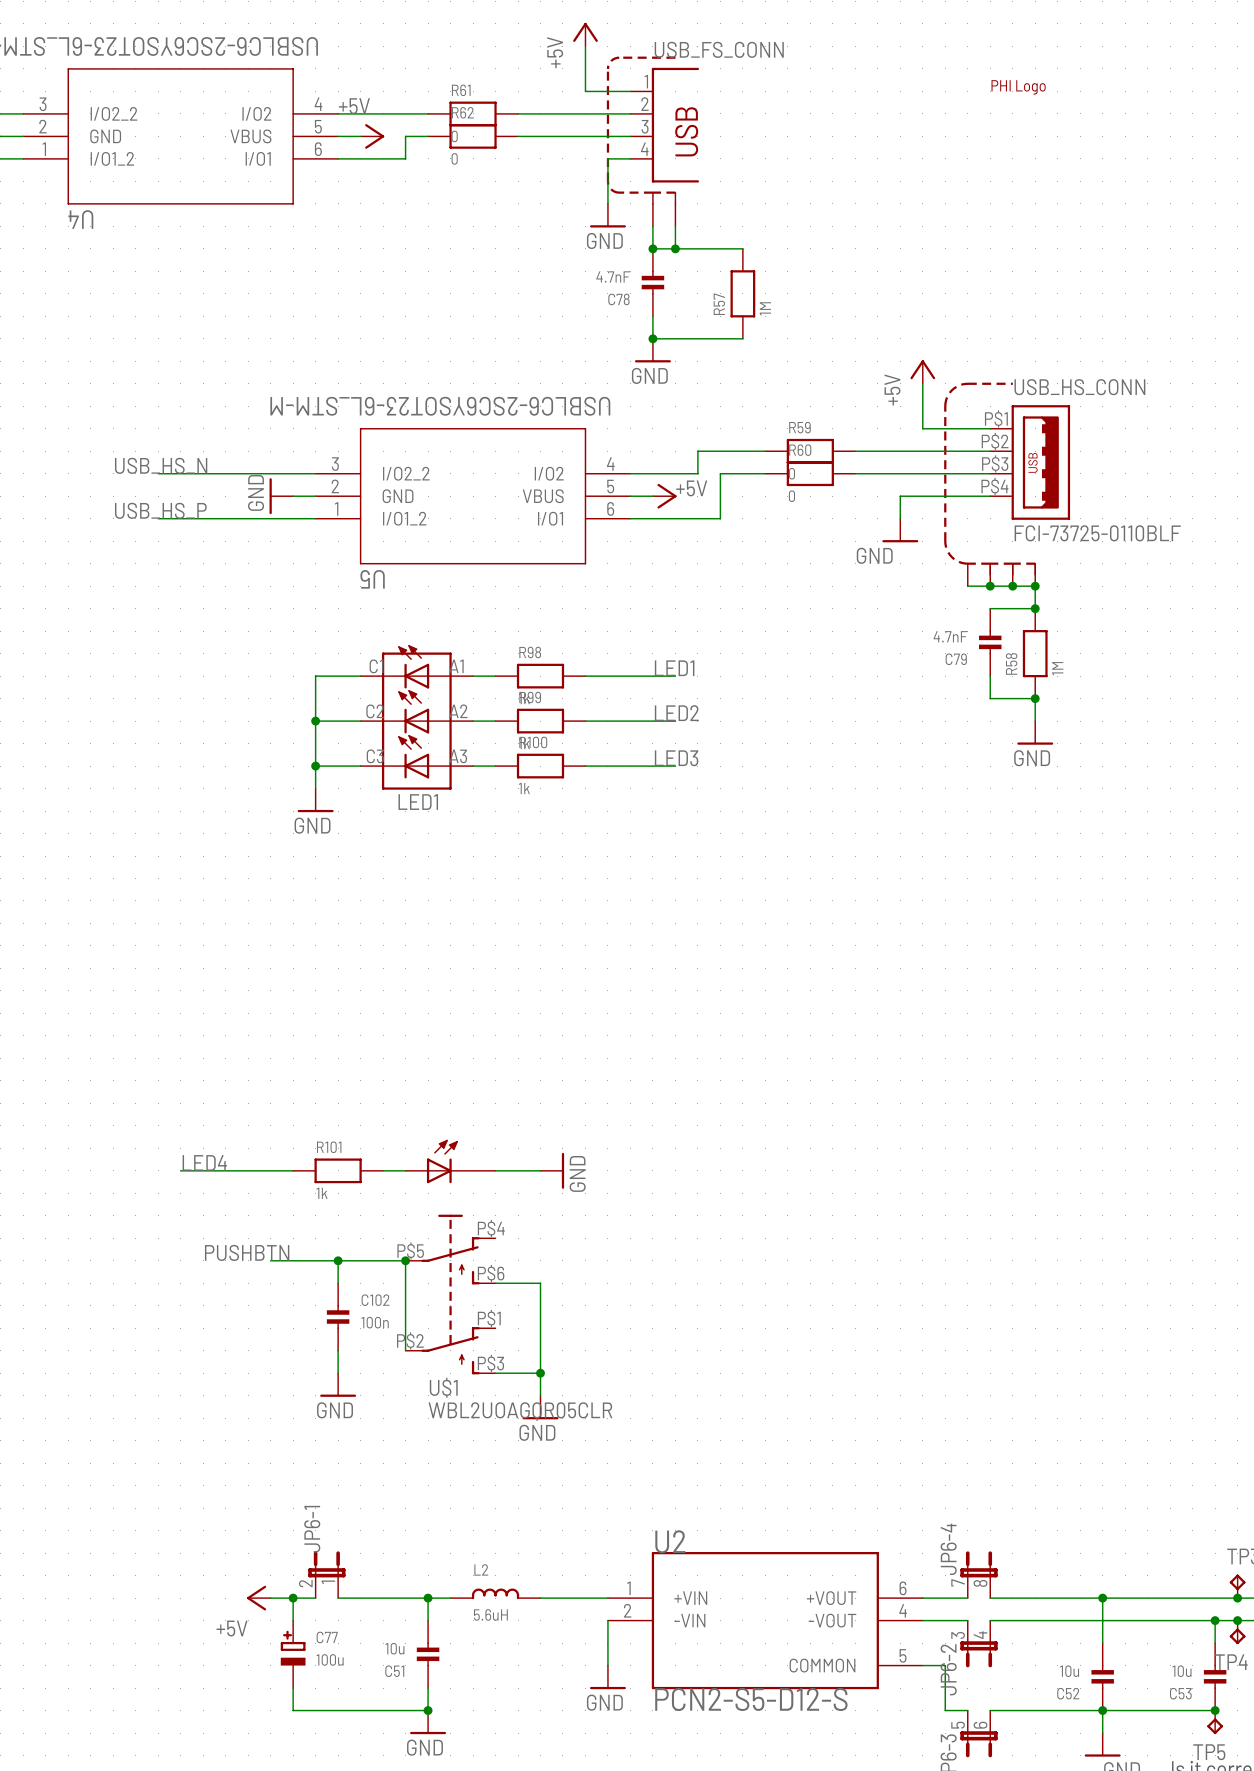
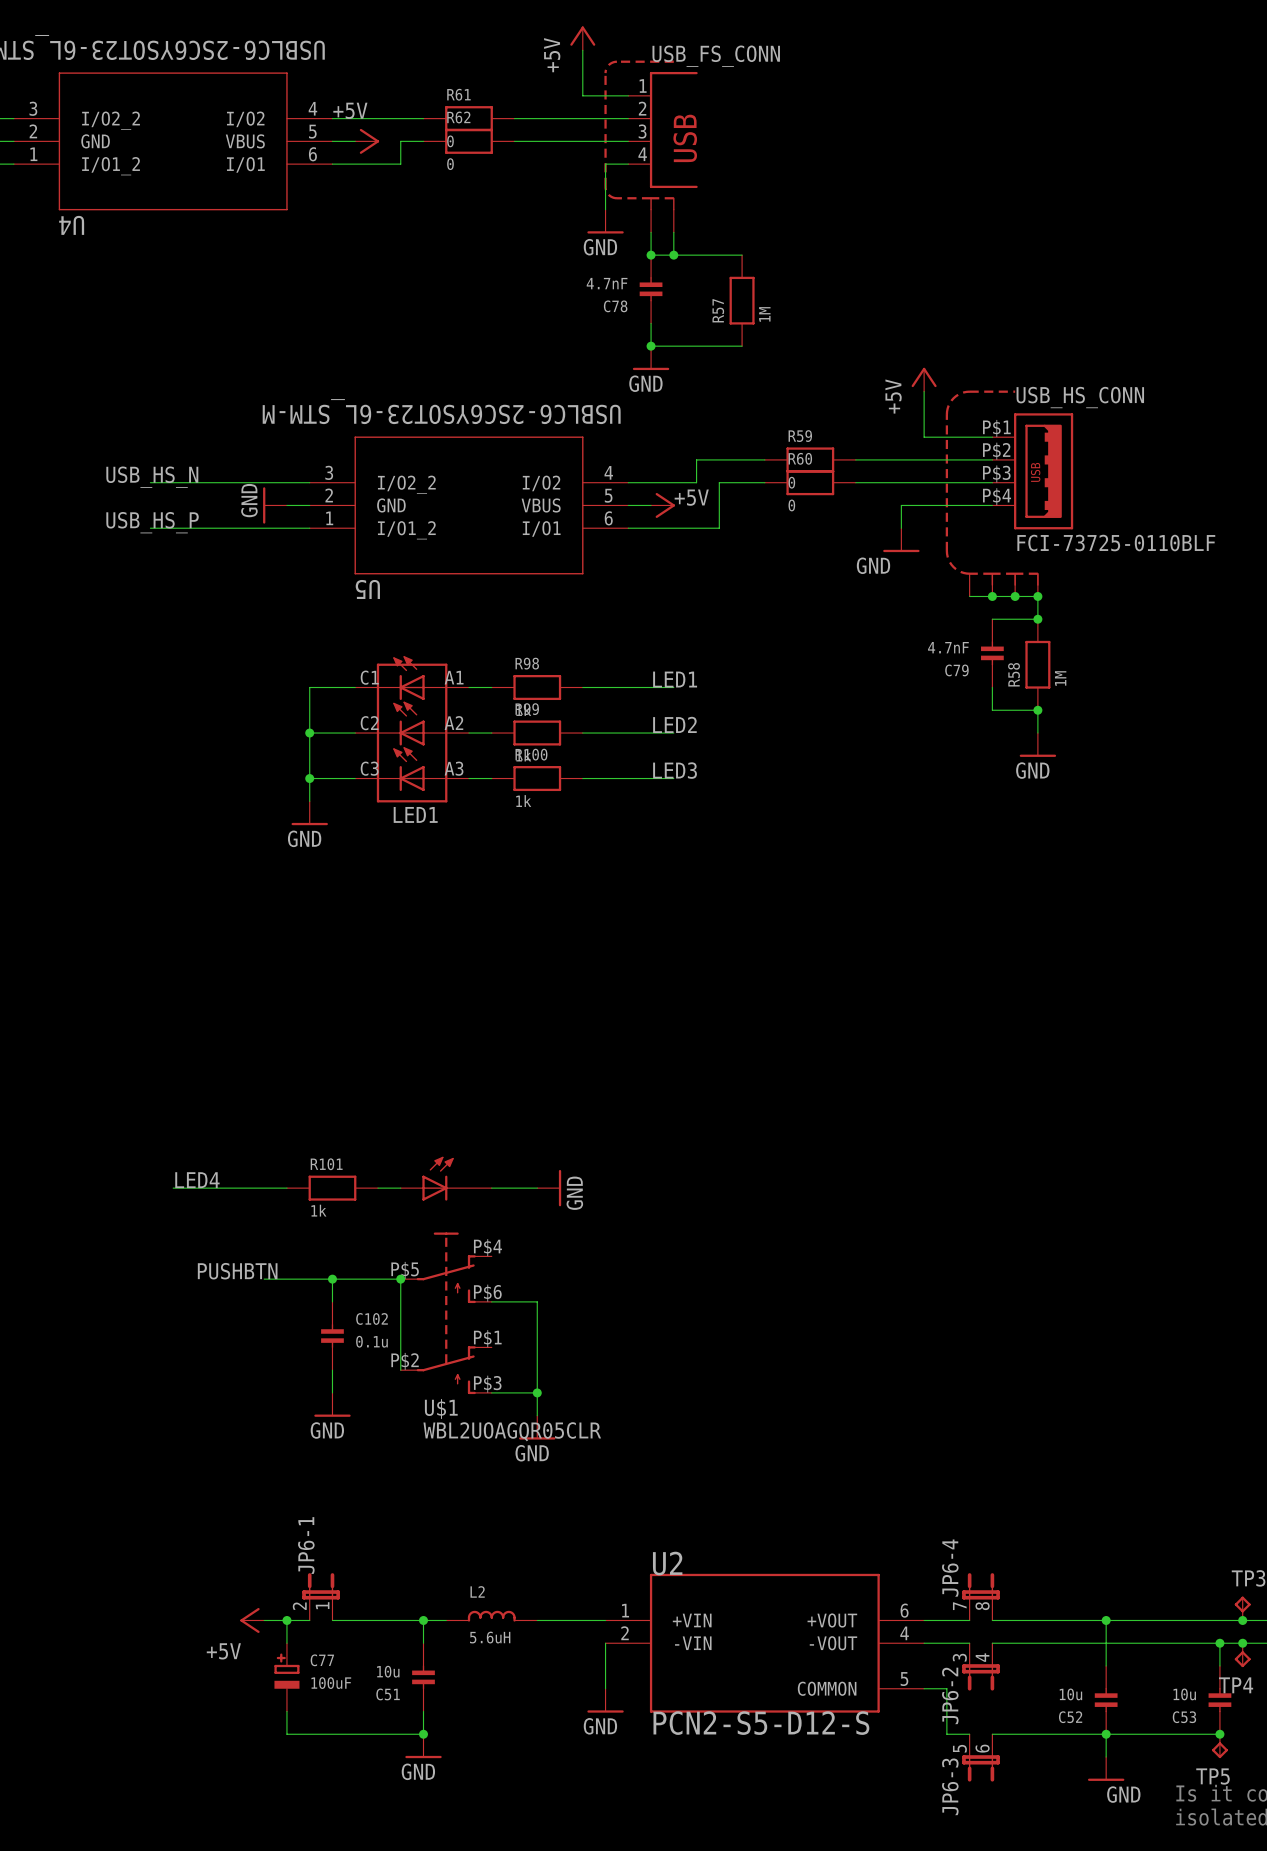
part: (1018, 87) -> none
C102 value: 100n (375, 1322) -> 0.1u (371, 1341)
C77 value: 100u (330, 1659) -> 100uF (331, 1683)

